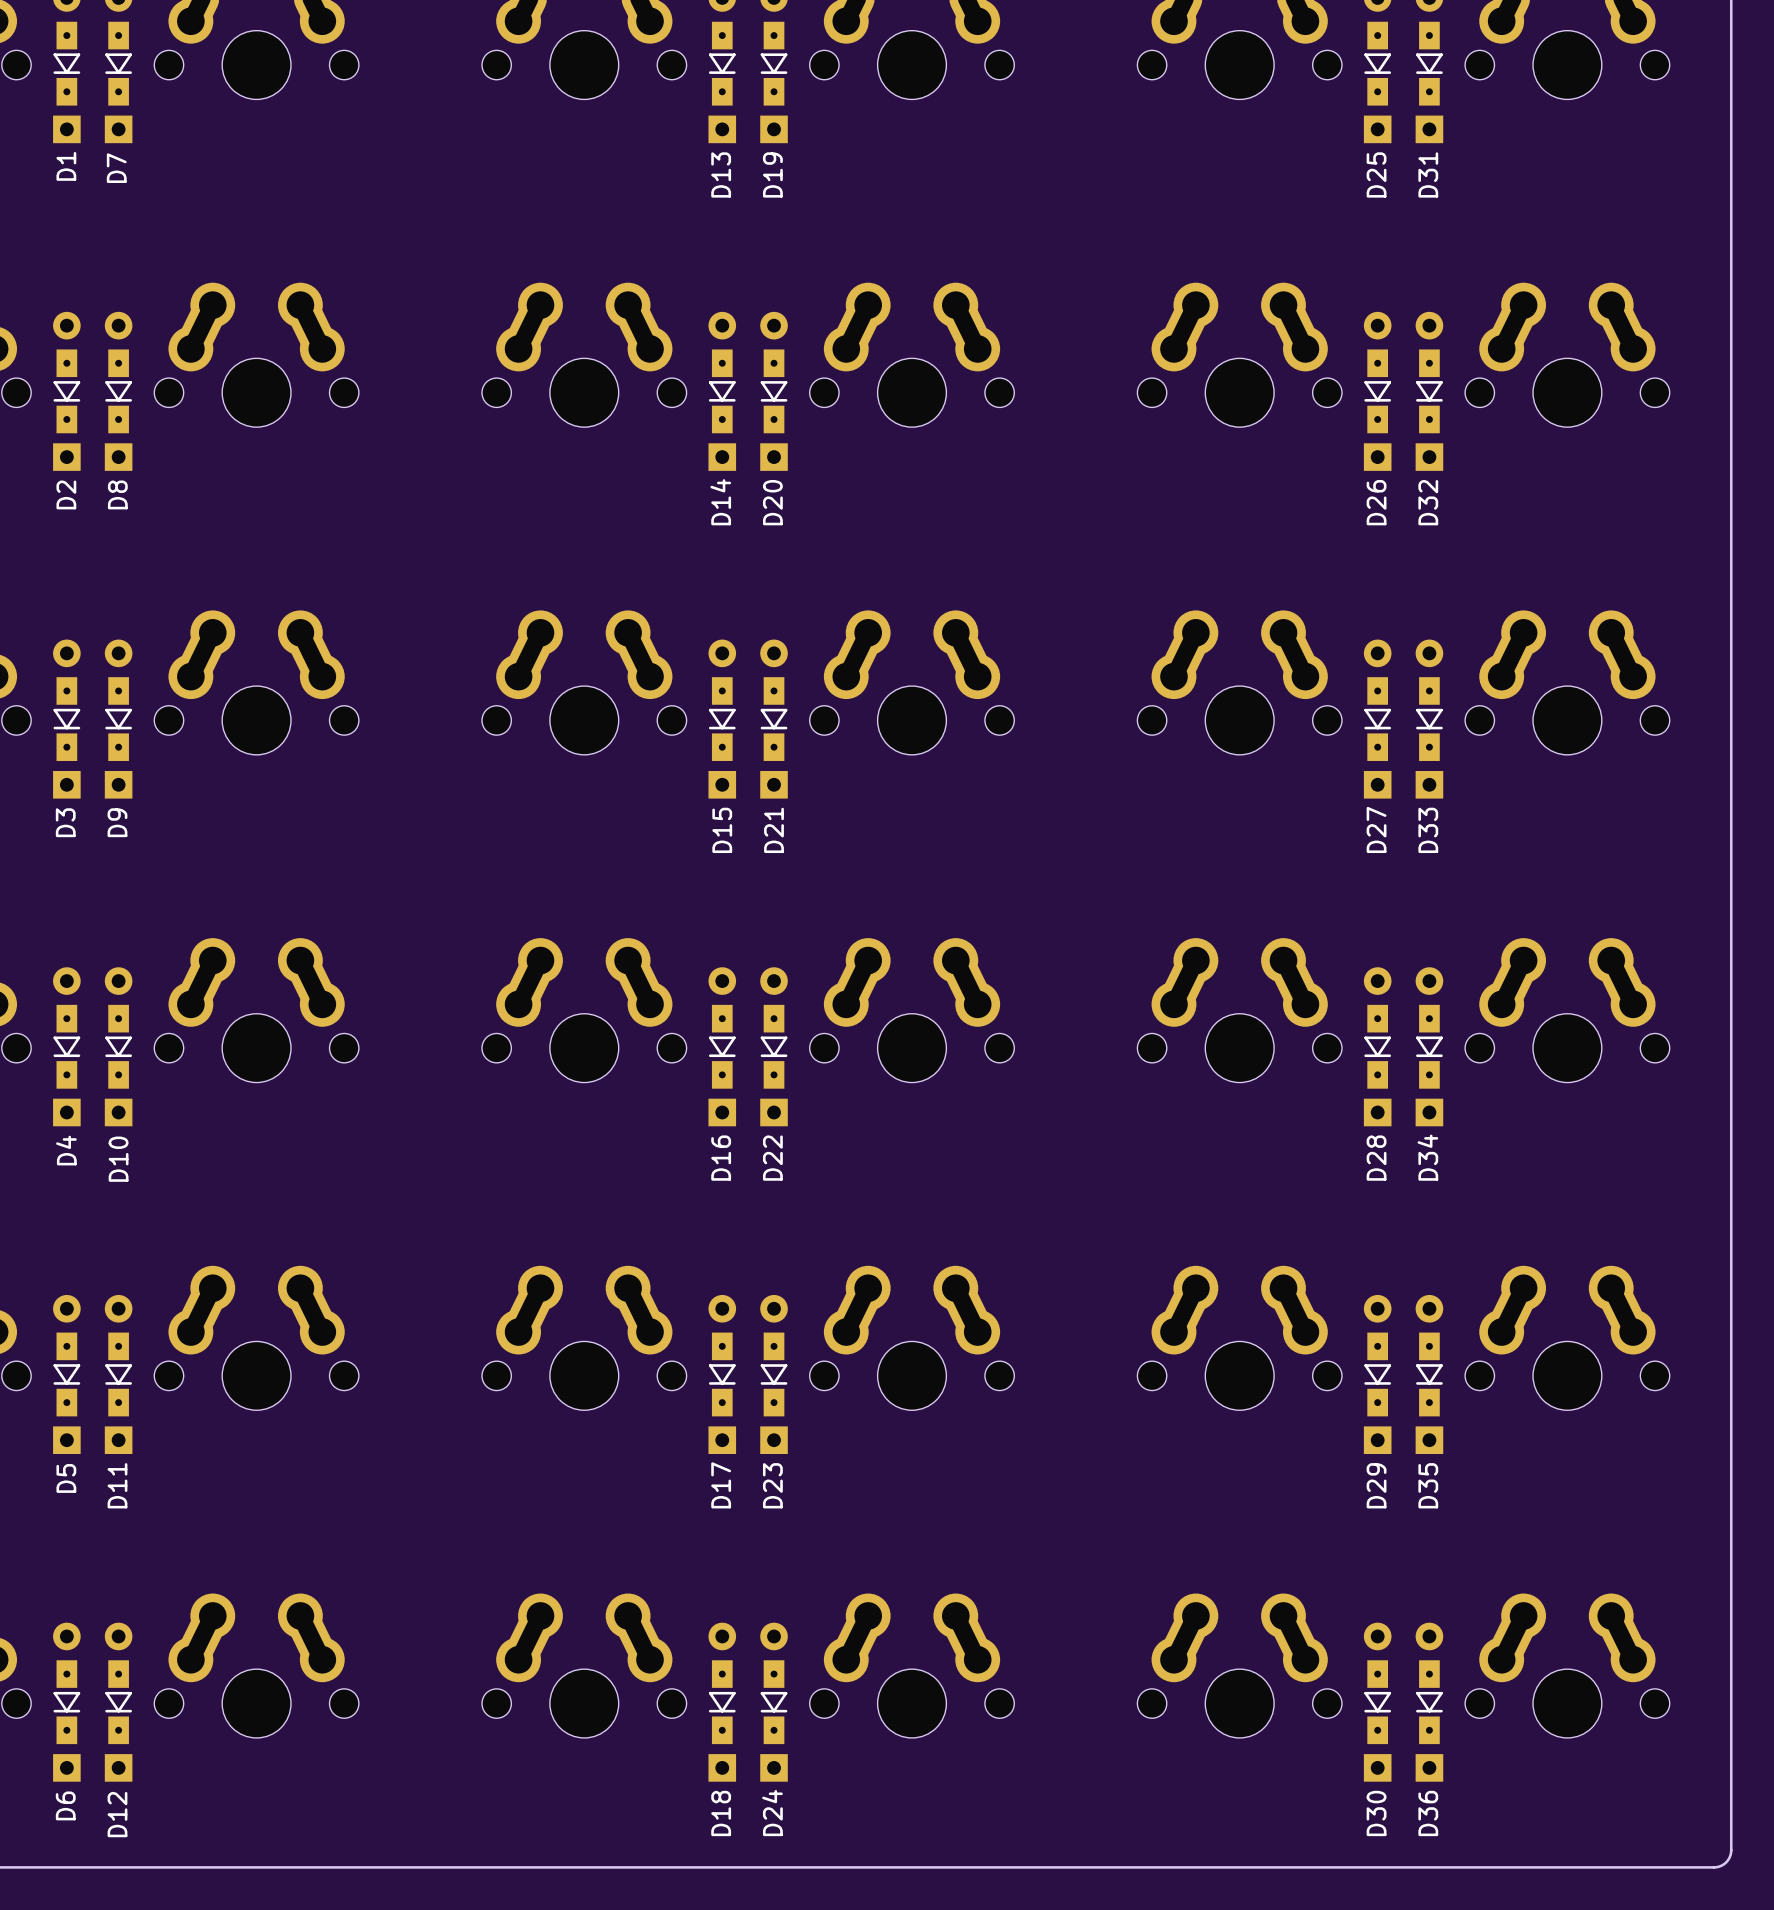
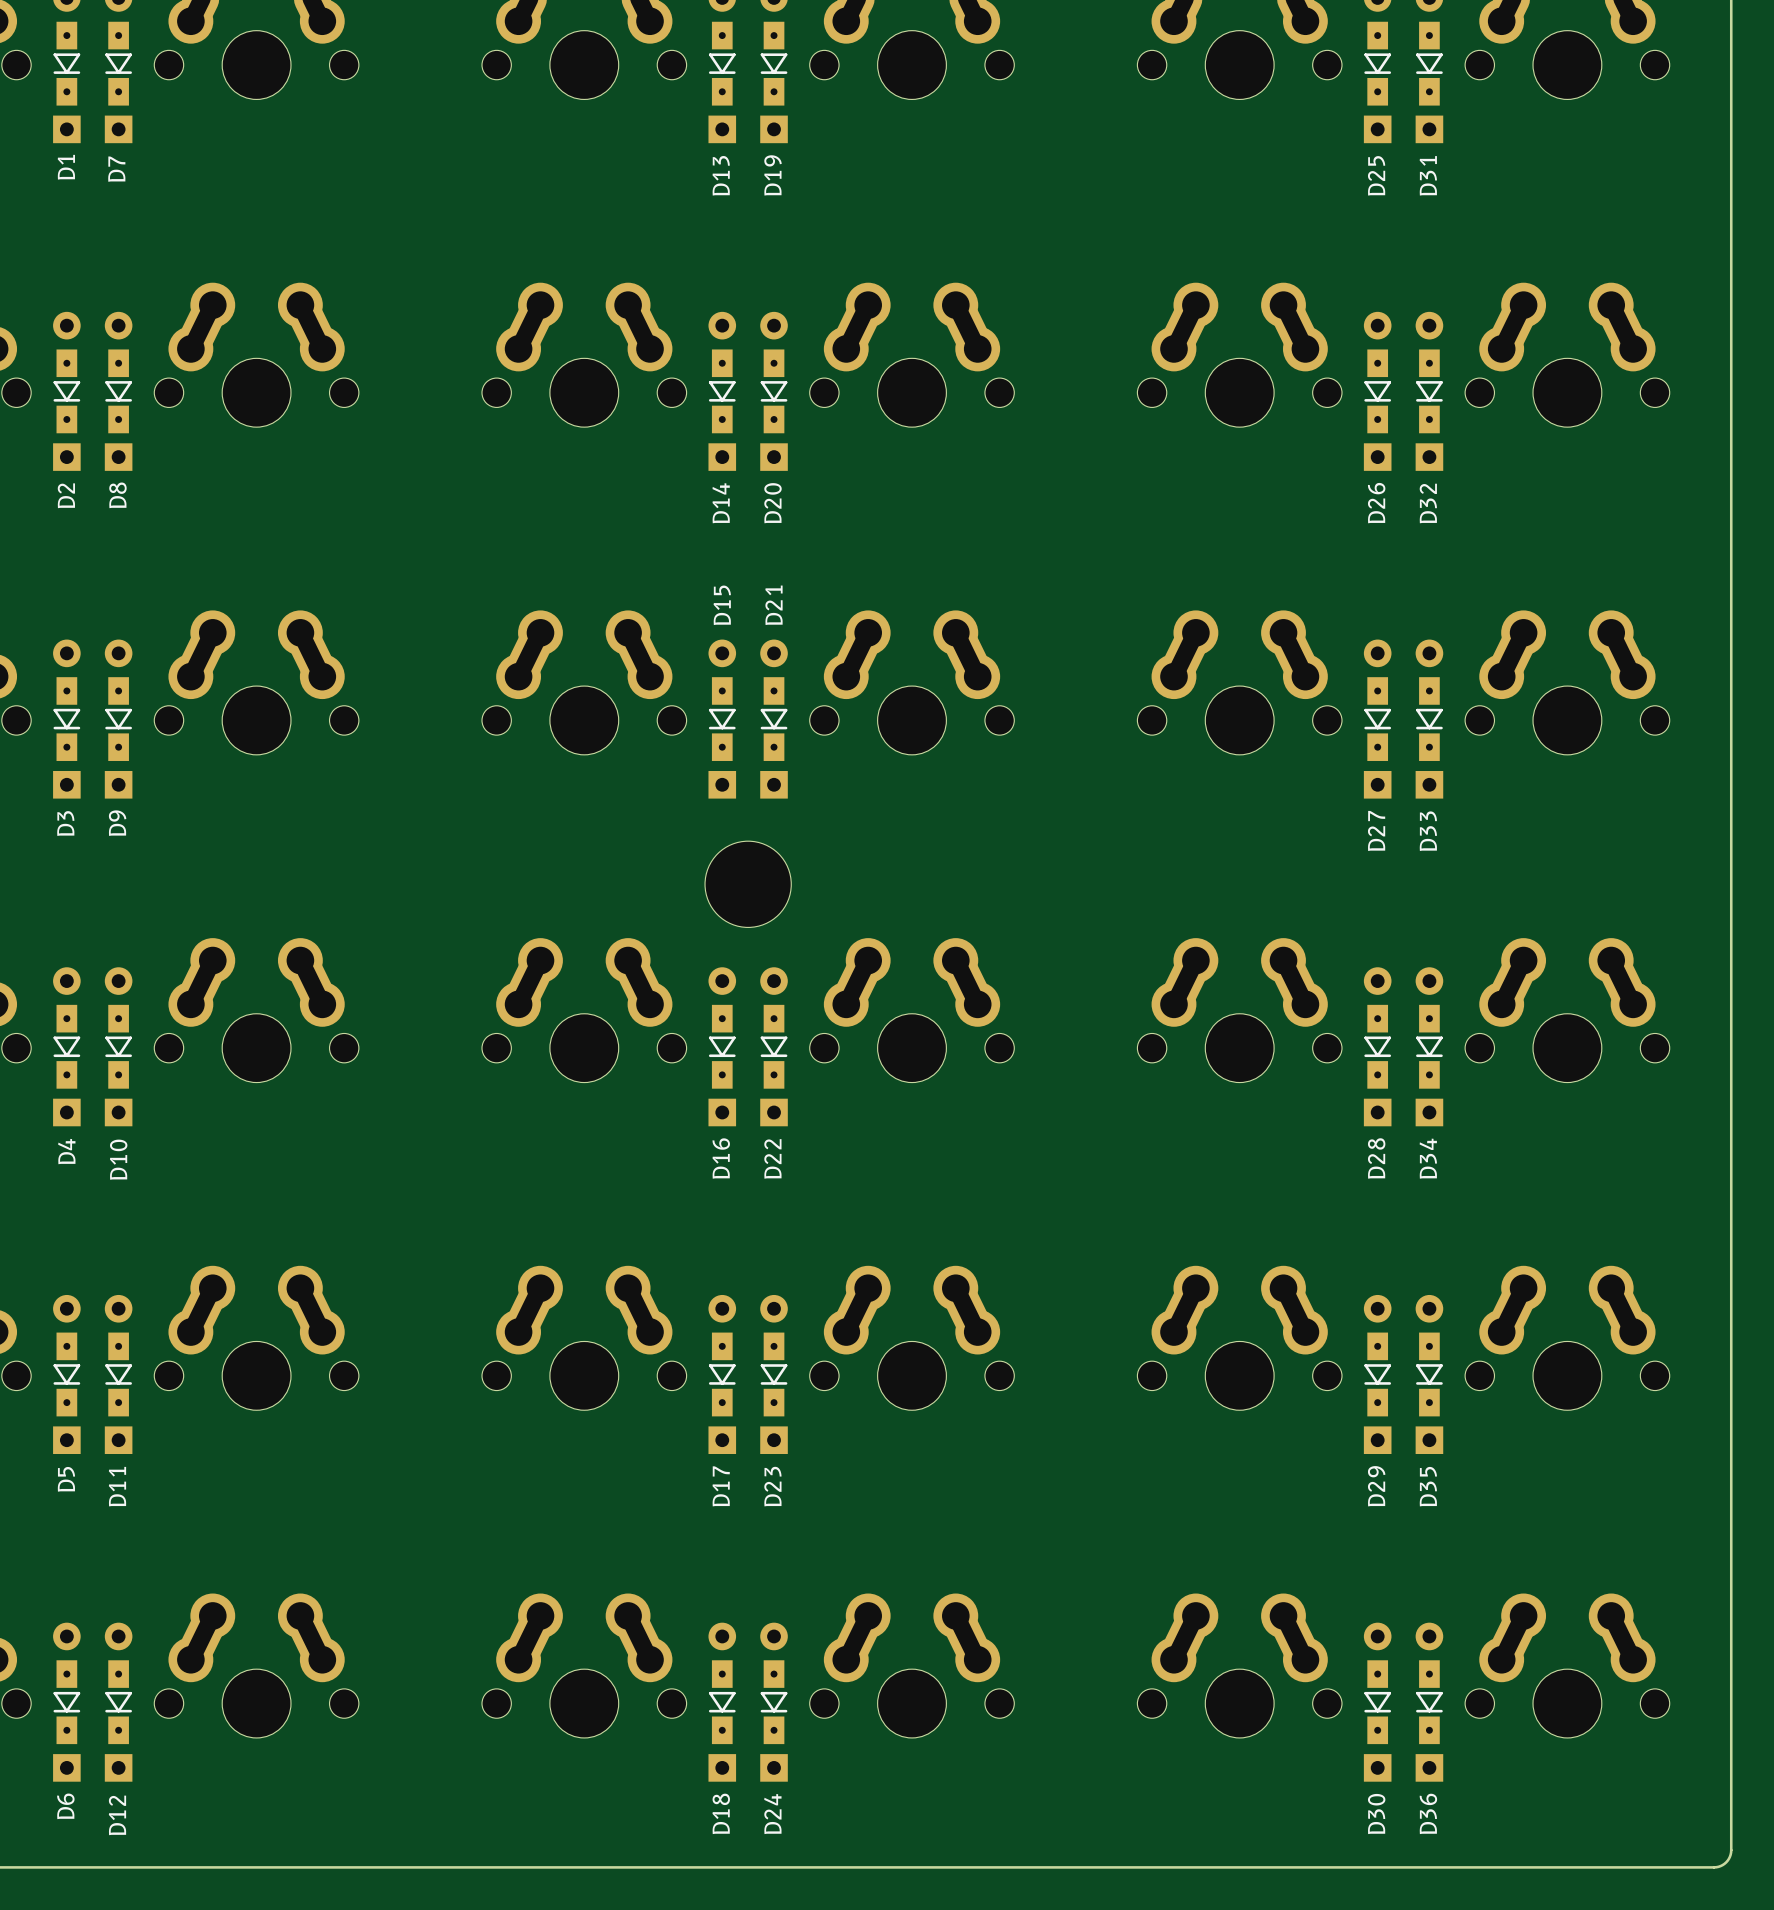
D15 name position: D15 (722, 830) -> D15 (722, 605)
D21 name position: D21 (773, 830) -> D21 (773, 605)
part: none -> (748, 884)

